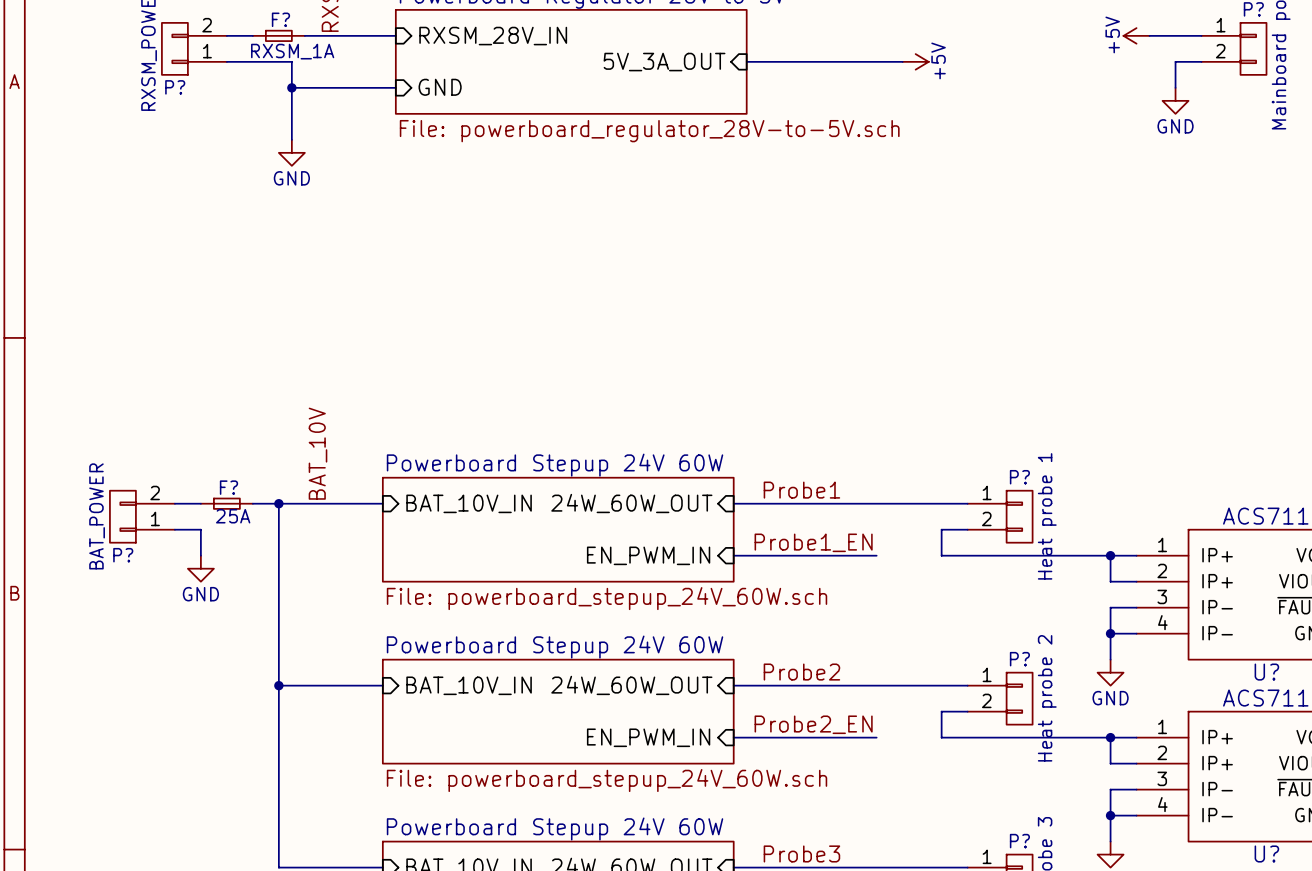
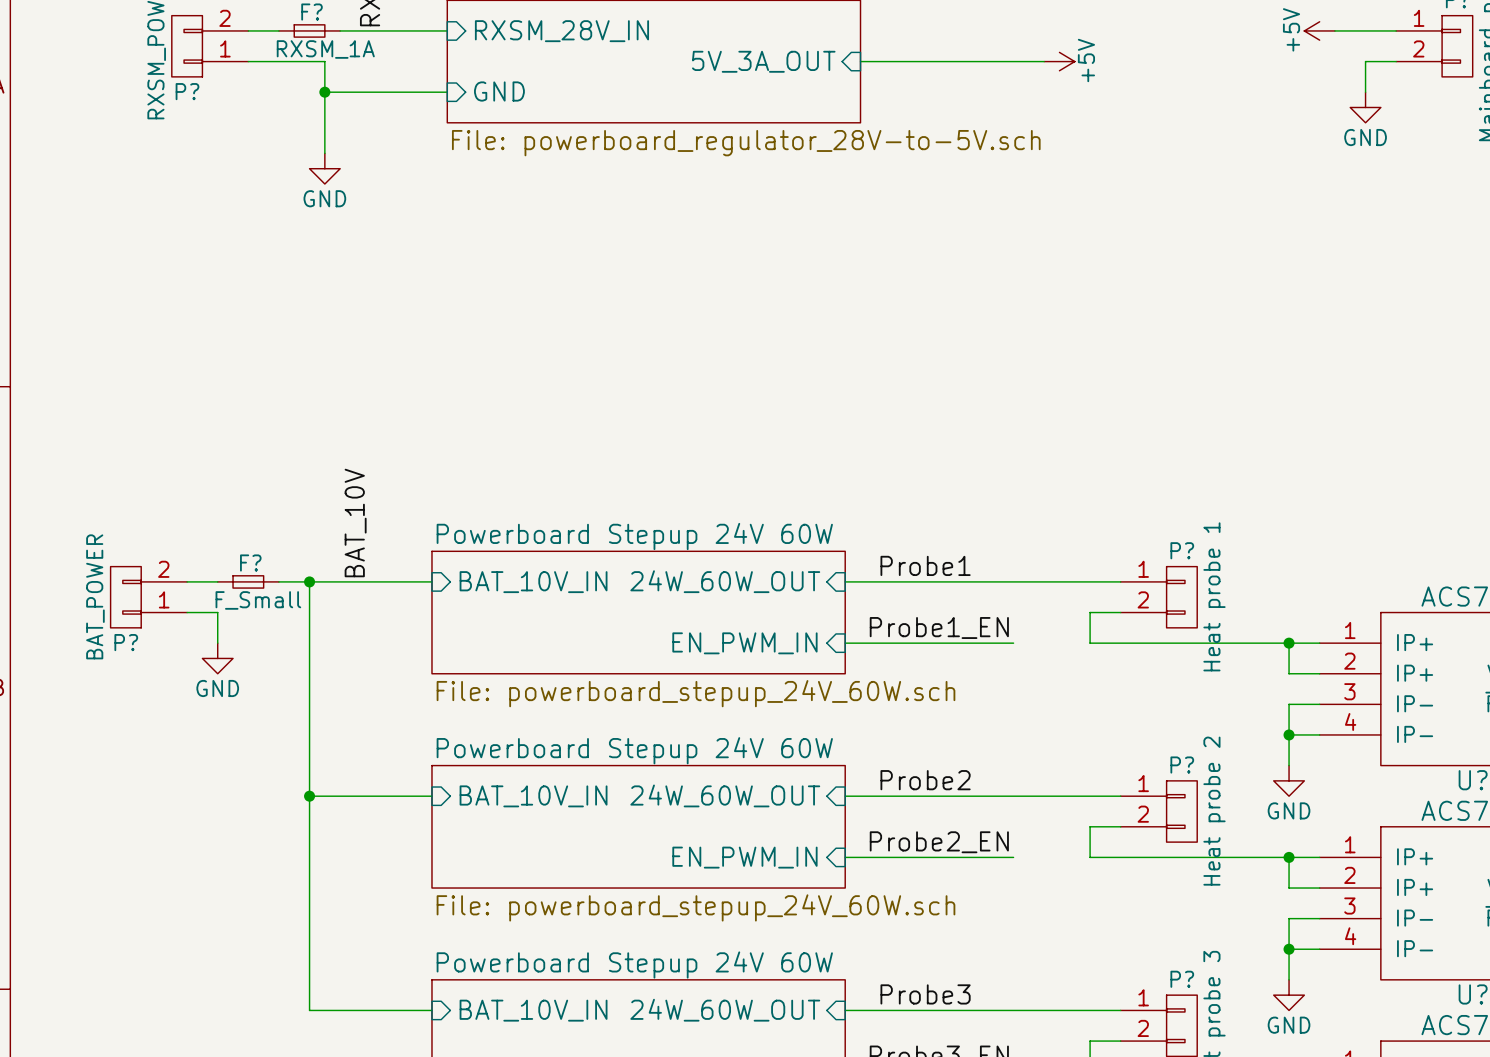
F? value: 25A (233, 516) -> F_Small (258, 600)

